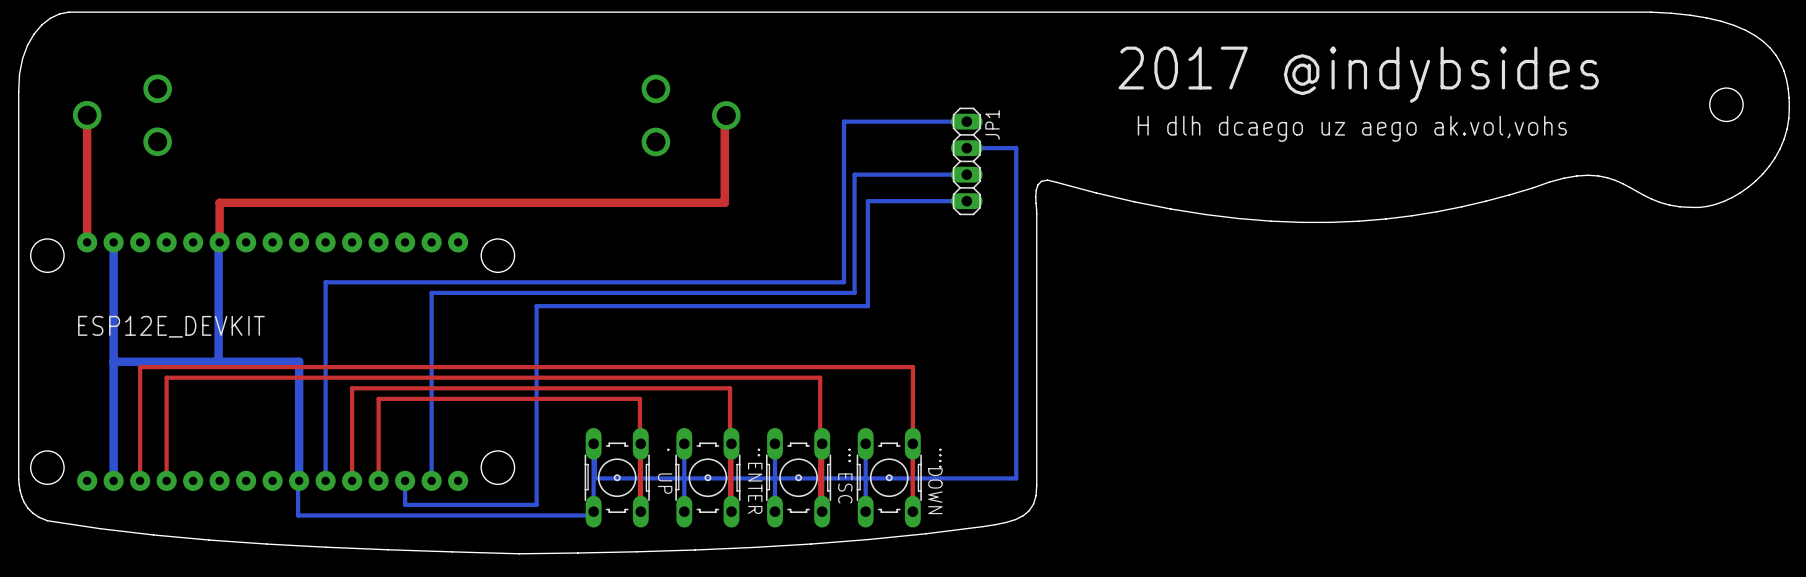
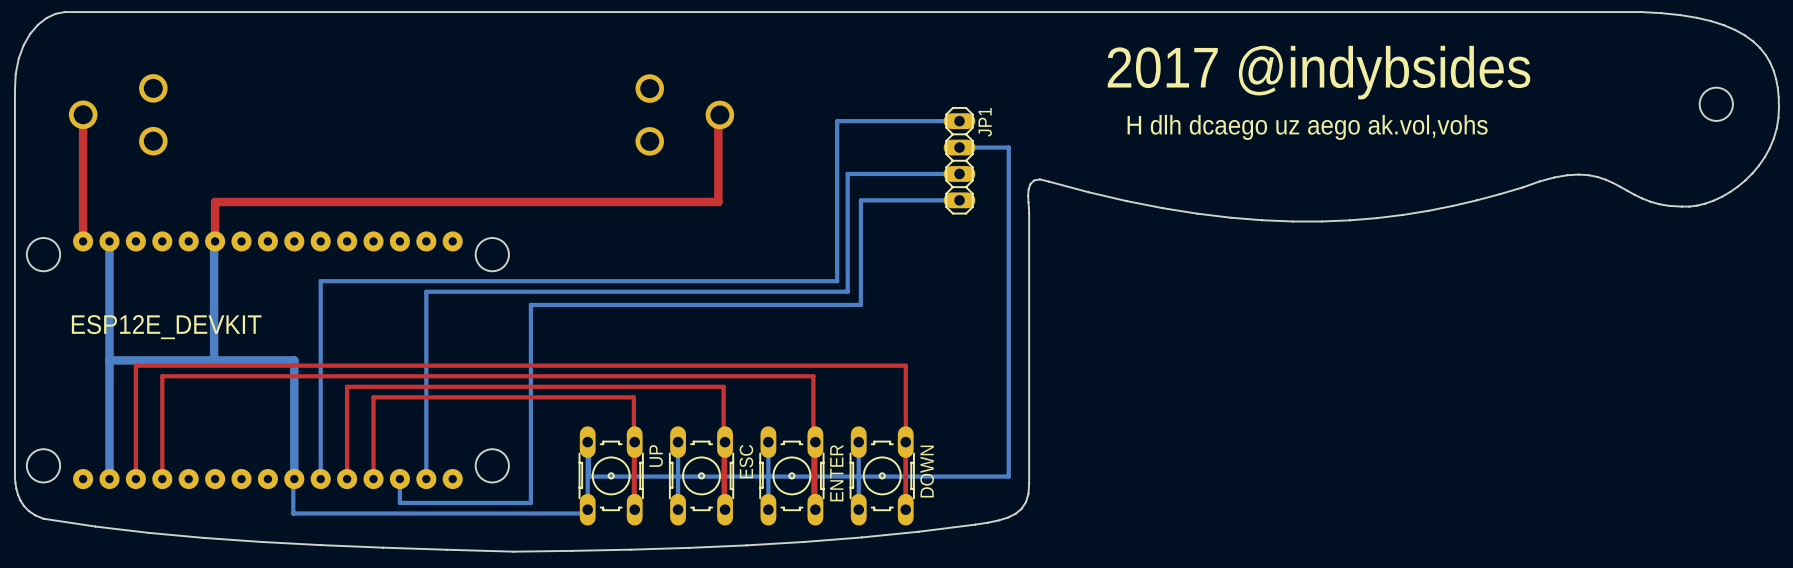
UP name: . (668, 449) -> UP (656, 456)
ESC name: .. (758, 452) -> ESC (746, 461)
ENTER name: ... (849, 455) -> ENTER (836, 473)
DOWN name: .... (940, 458) -> DOWN (927, 471)
text: UP (665, 483) -> none
text: ENTER (755, 488) -> none
text: ESC (845, 488) -> none
text: DOWN (935, 491) -> none

